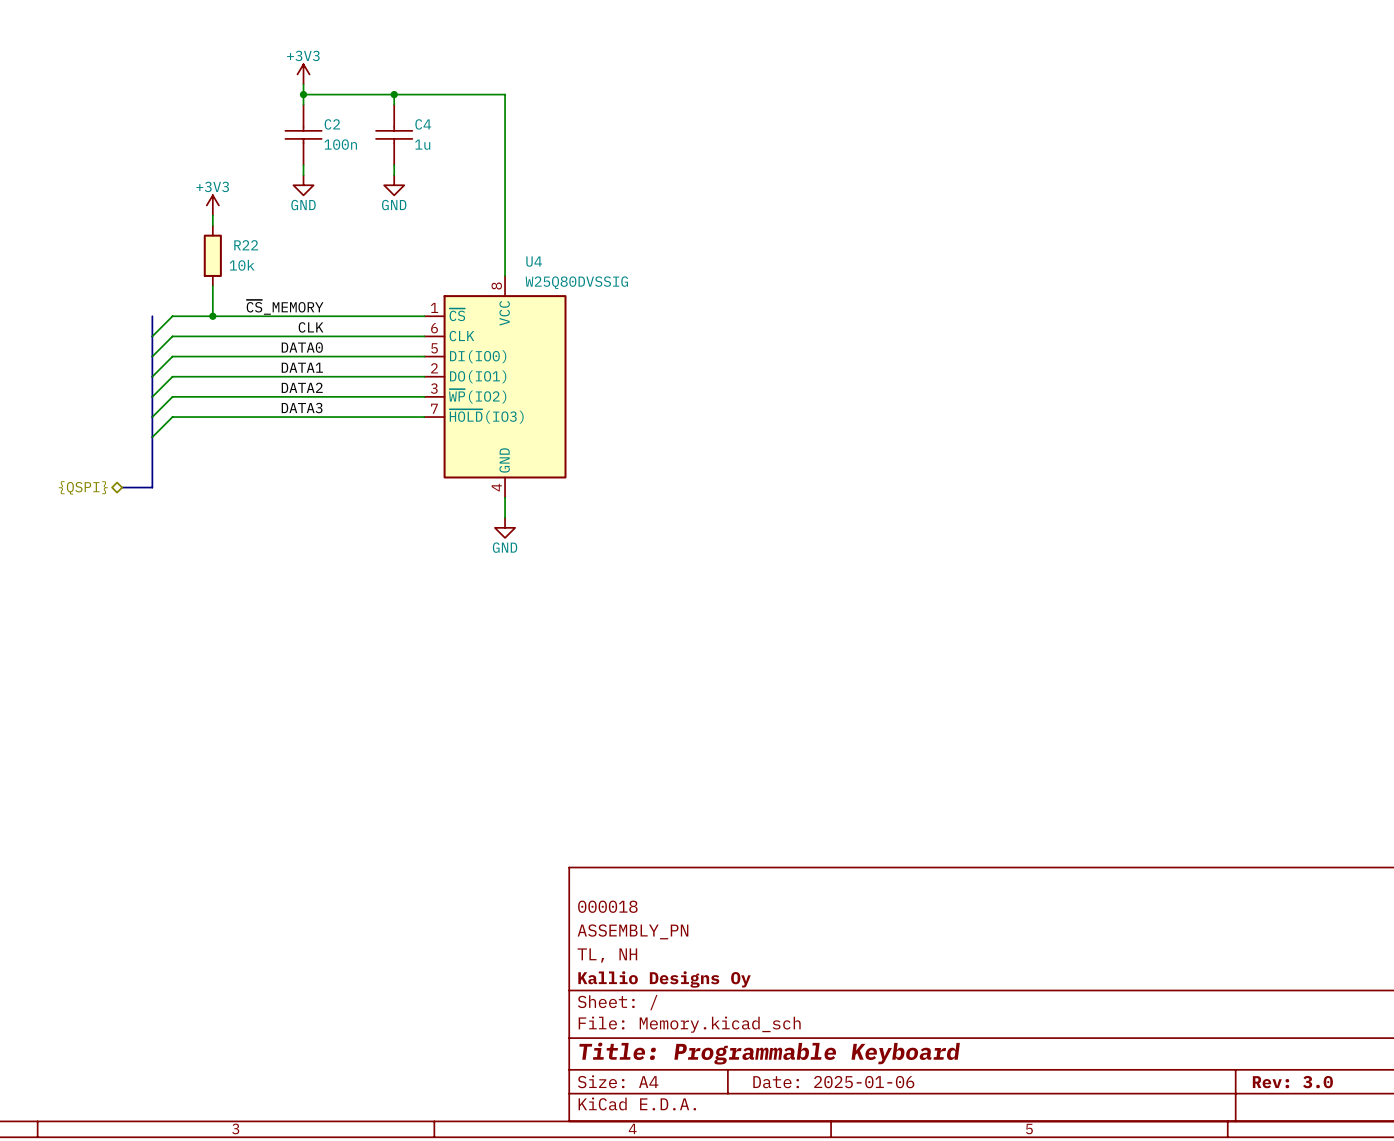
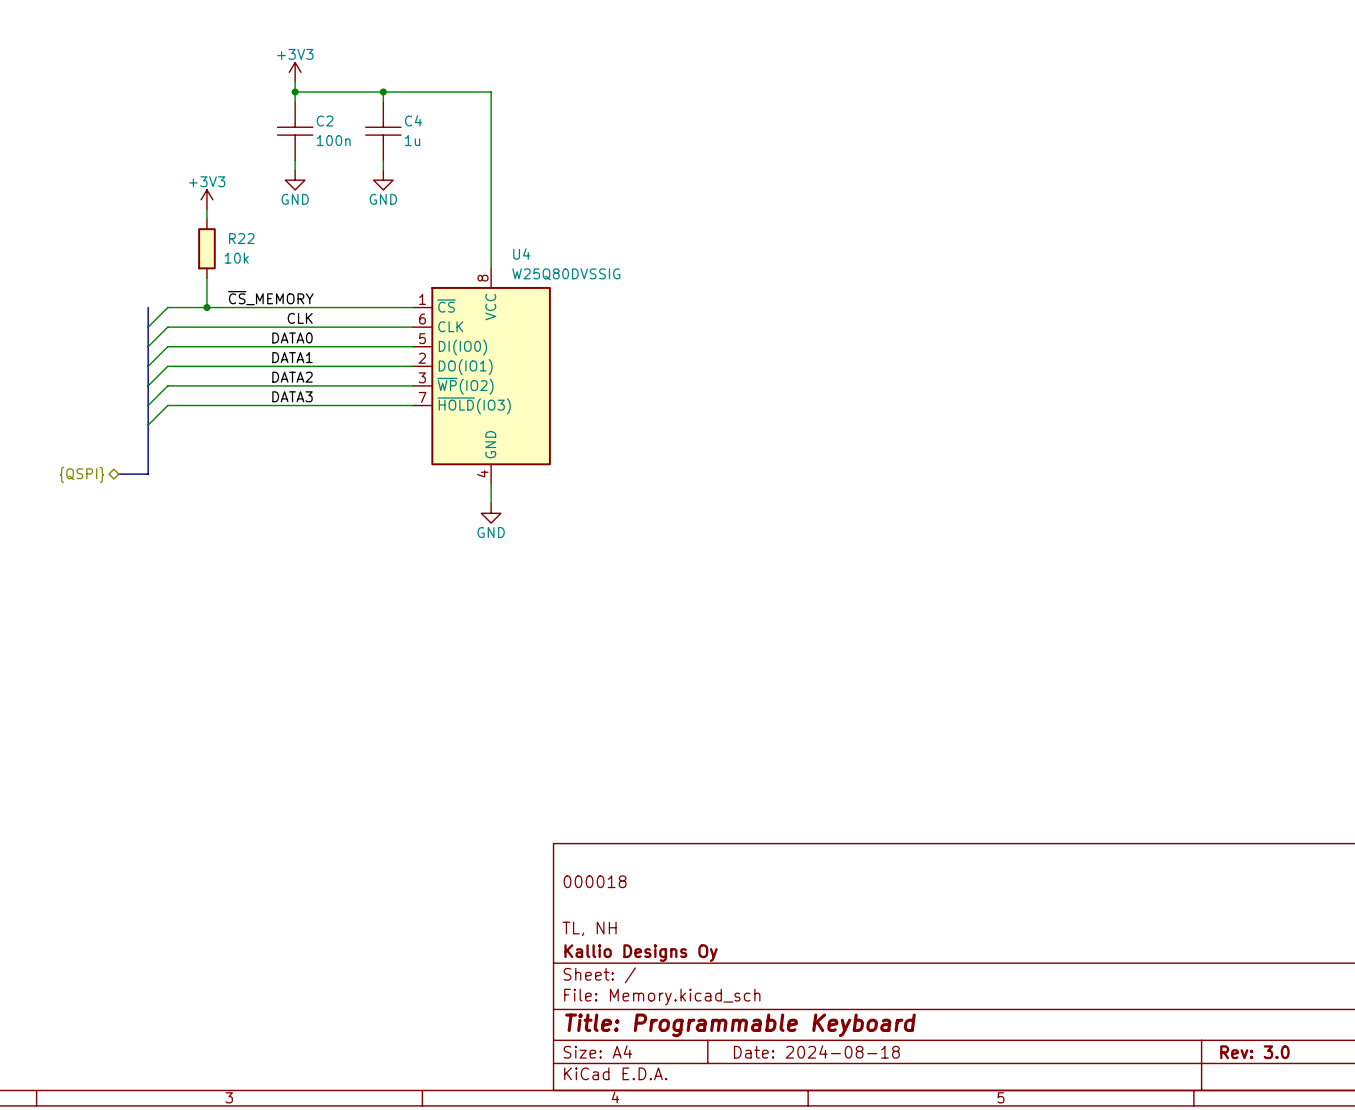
title block: ASSEMBLY_PN (633, 931) -> none
title block: Date: 2025-01-06 (833, 1082) -> Date: 2024-08-18 (816, 1051)

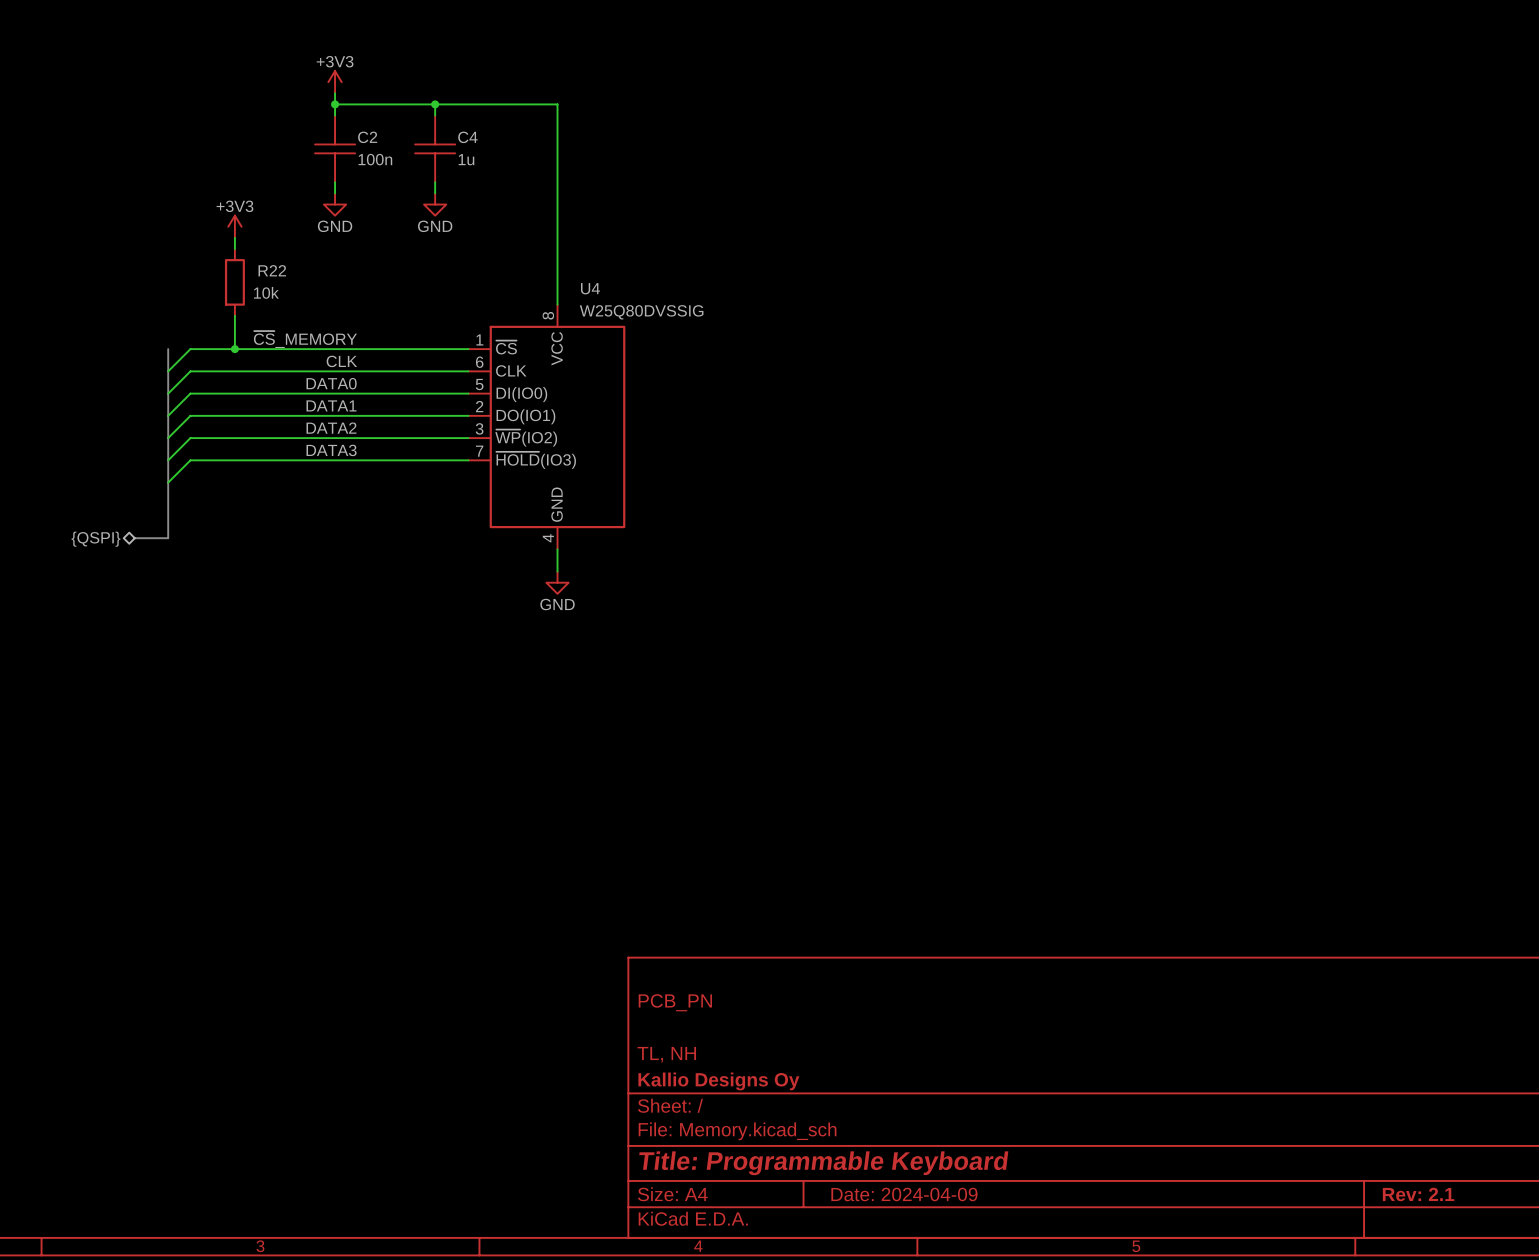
title block: 000018 (595, 881) -> PCB_PN (675, 1002)
title block: Date: 2024-08-18 (816, 1051) -> Date: 2024-04-09 (904, 1194)
title block: Rev: 3.0 (1254, 1052) -> Rev: 2.1 (1418, 1194)

